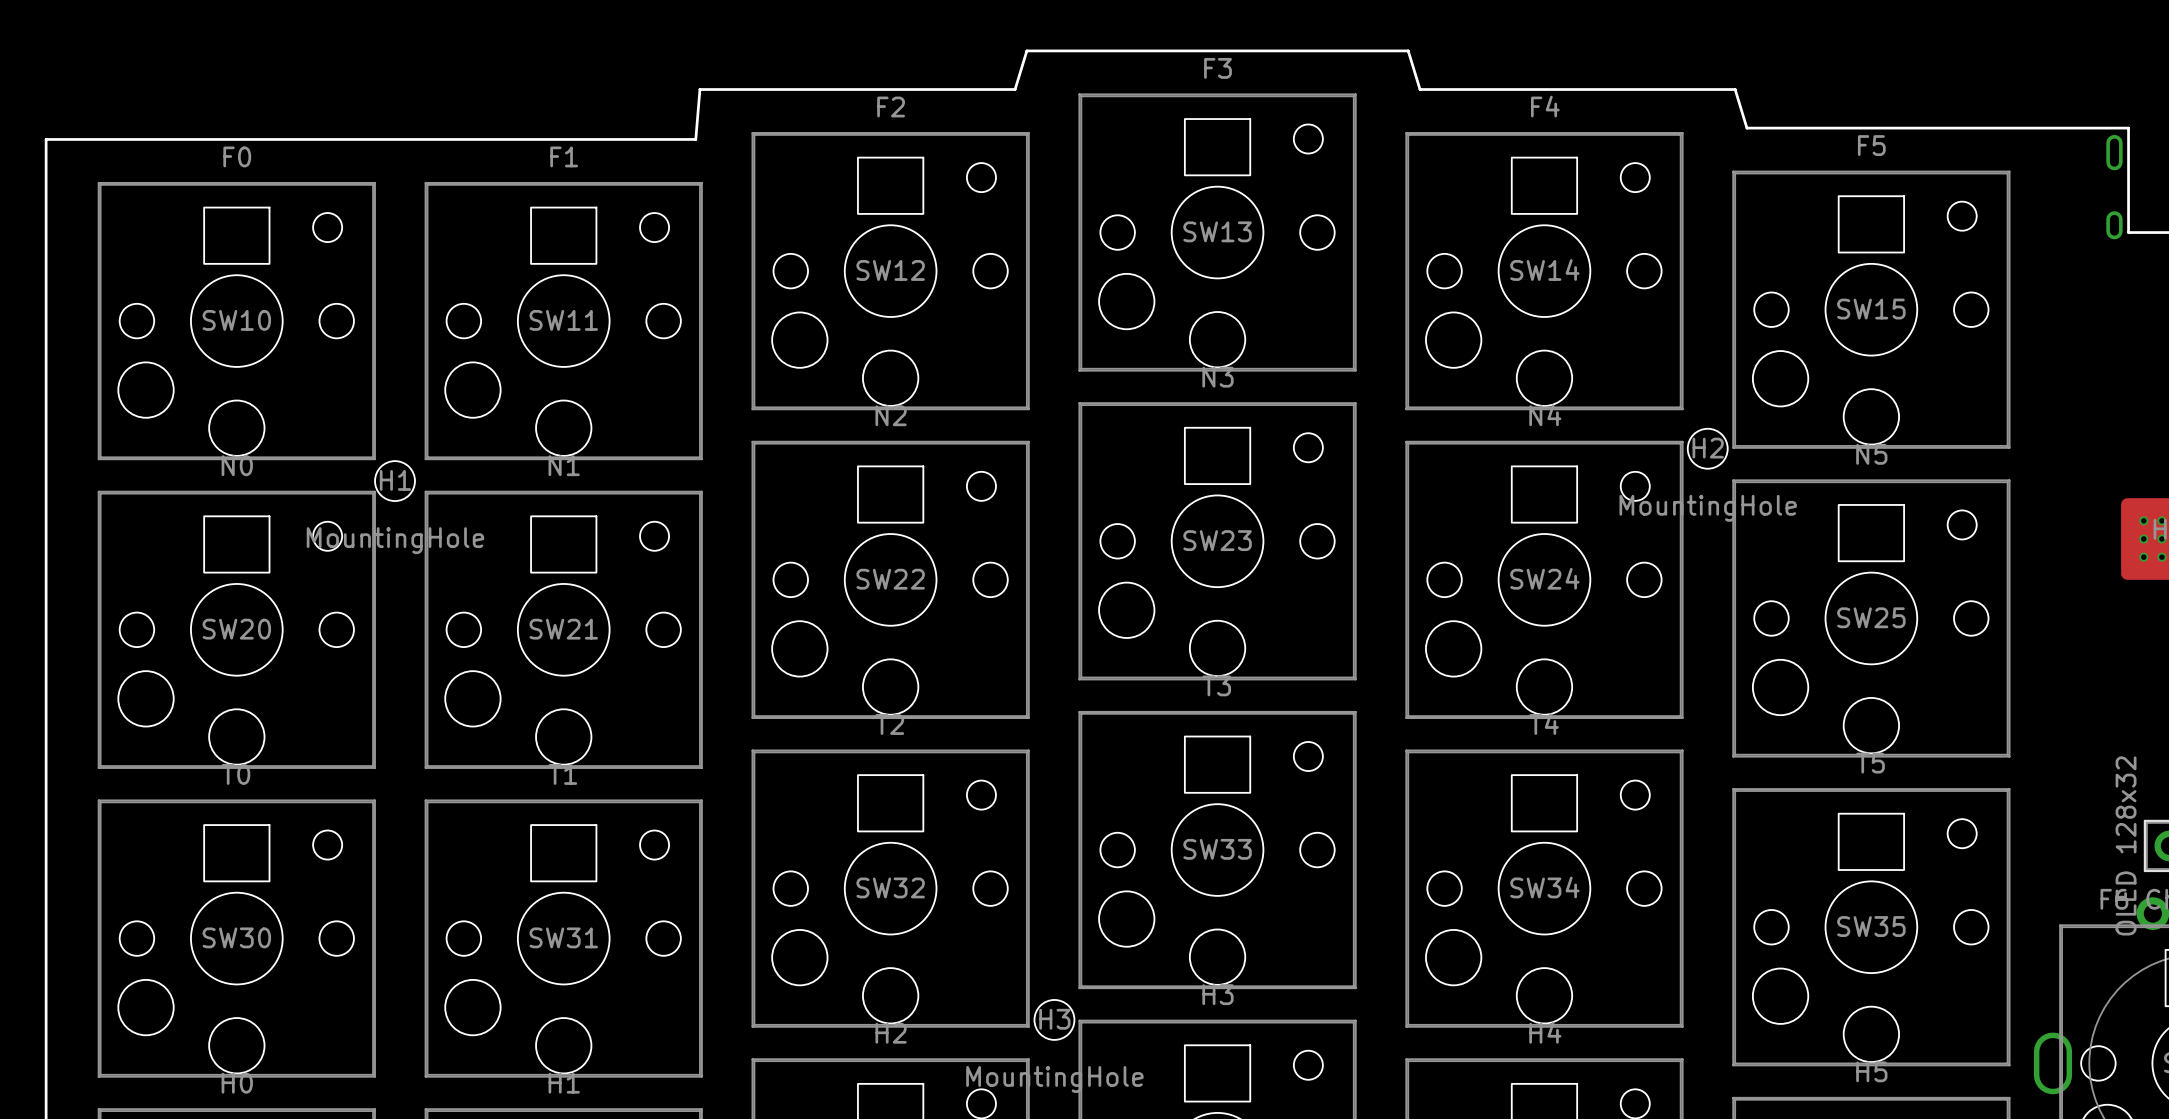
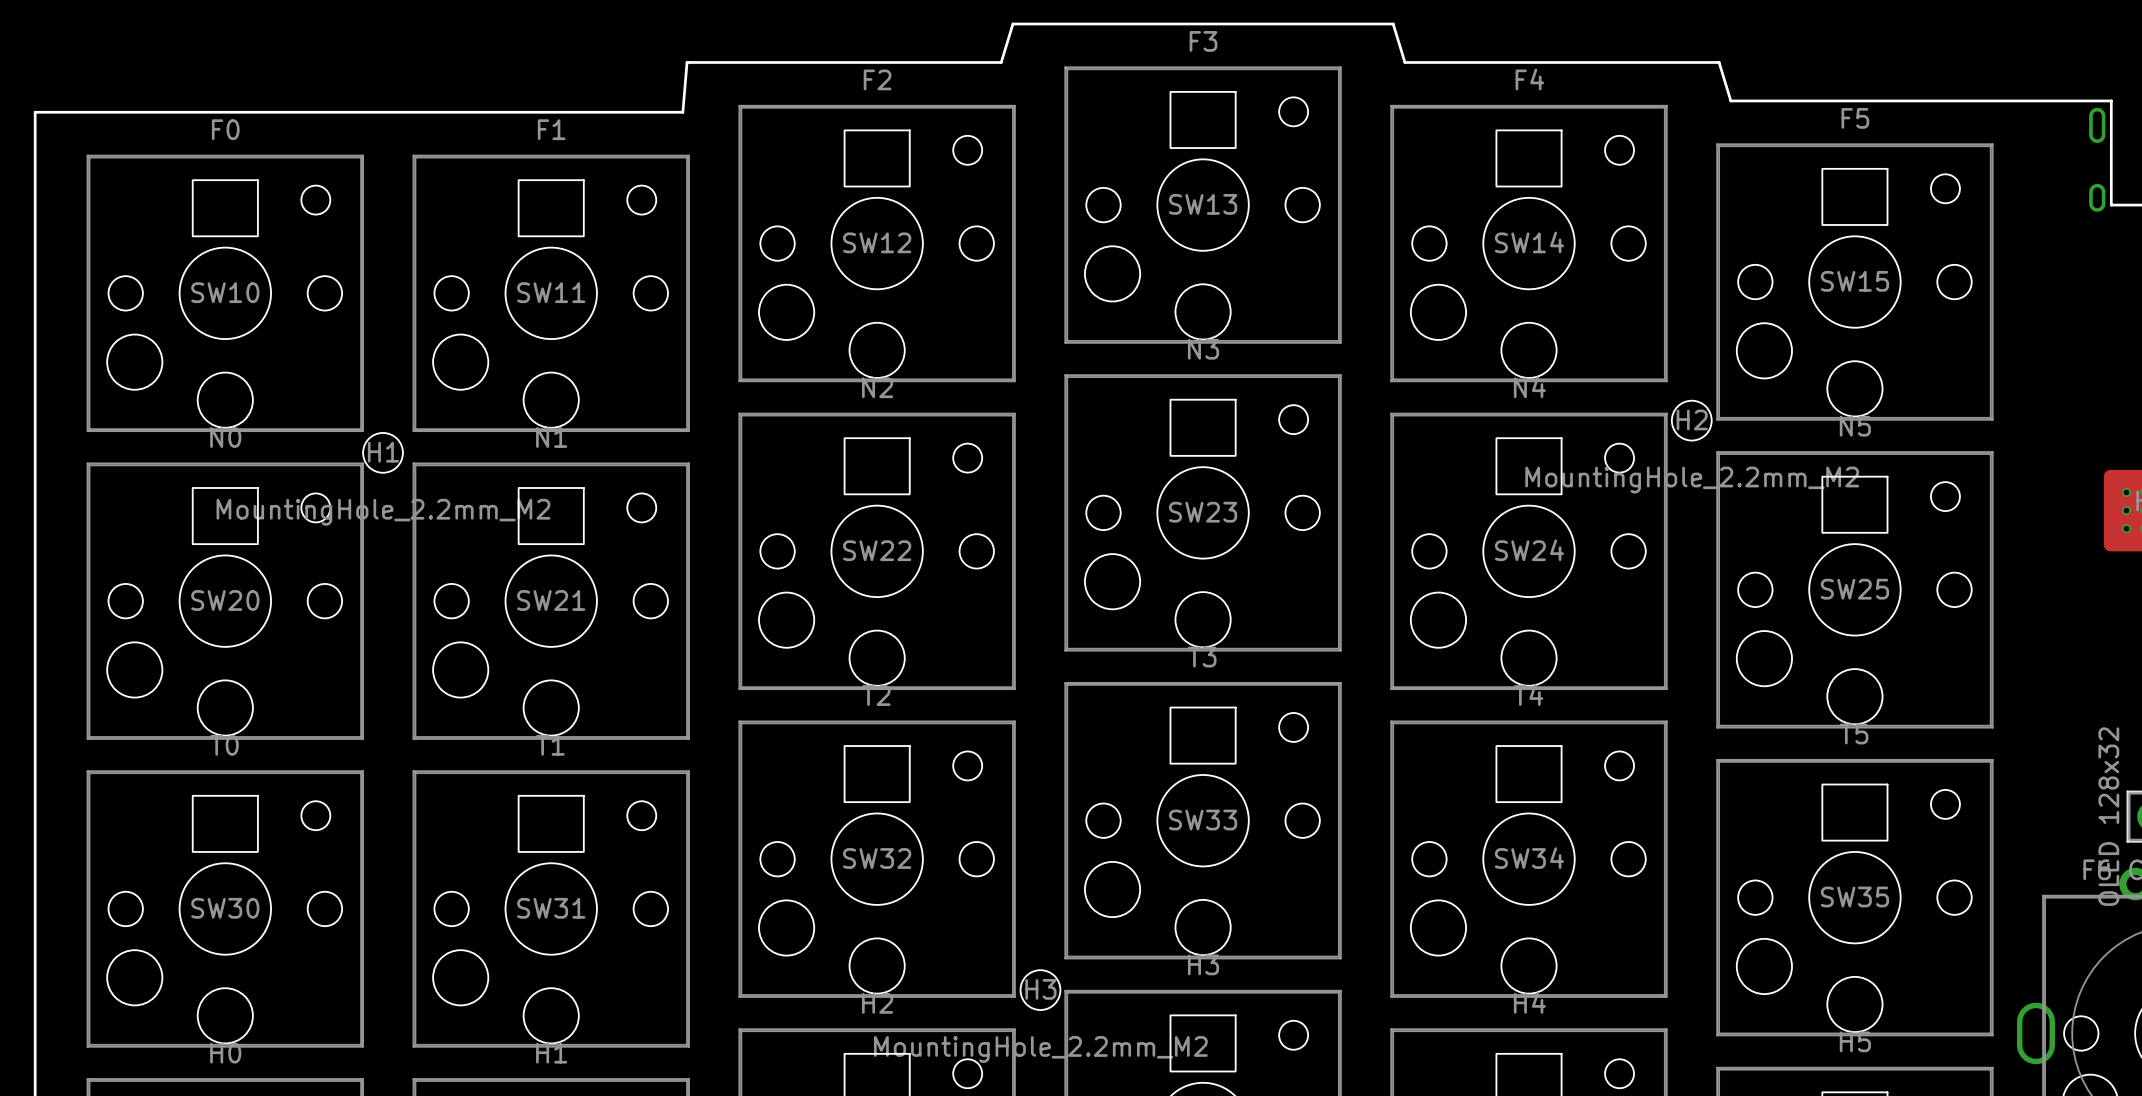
H2 value: MountingHole (1708, 508) -> MountingHole_2.2mm_M2 (1692, 480)
H1 value: MountingHole (395, 540) -> MountingHole_2.2mm_M2 (383, 512)
H3 value: MountingHole (1054, 1079) -> MountingHole_2.2mm_M2 (1040, 1049)

